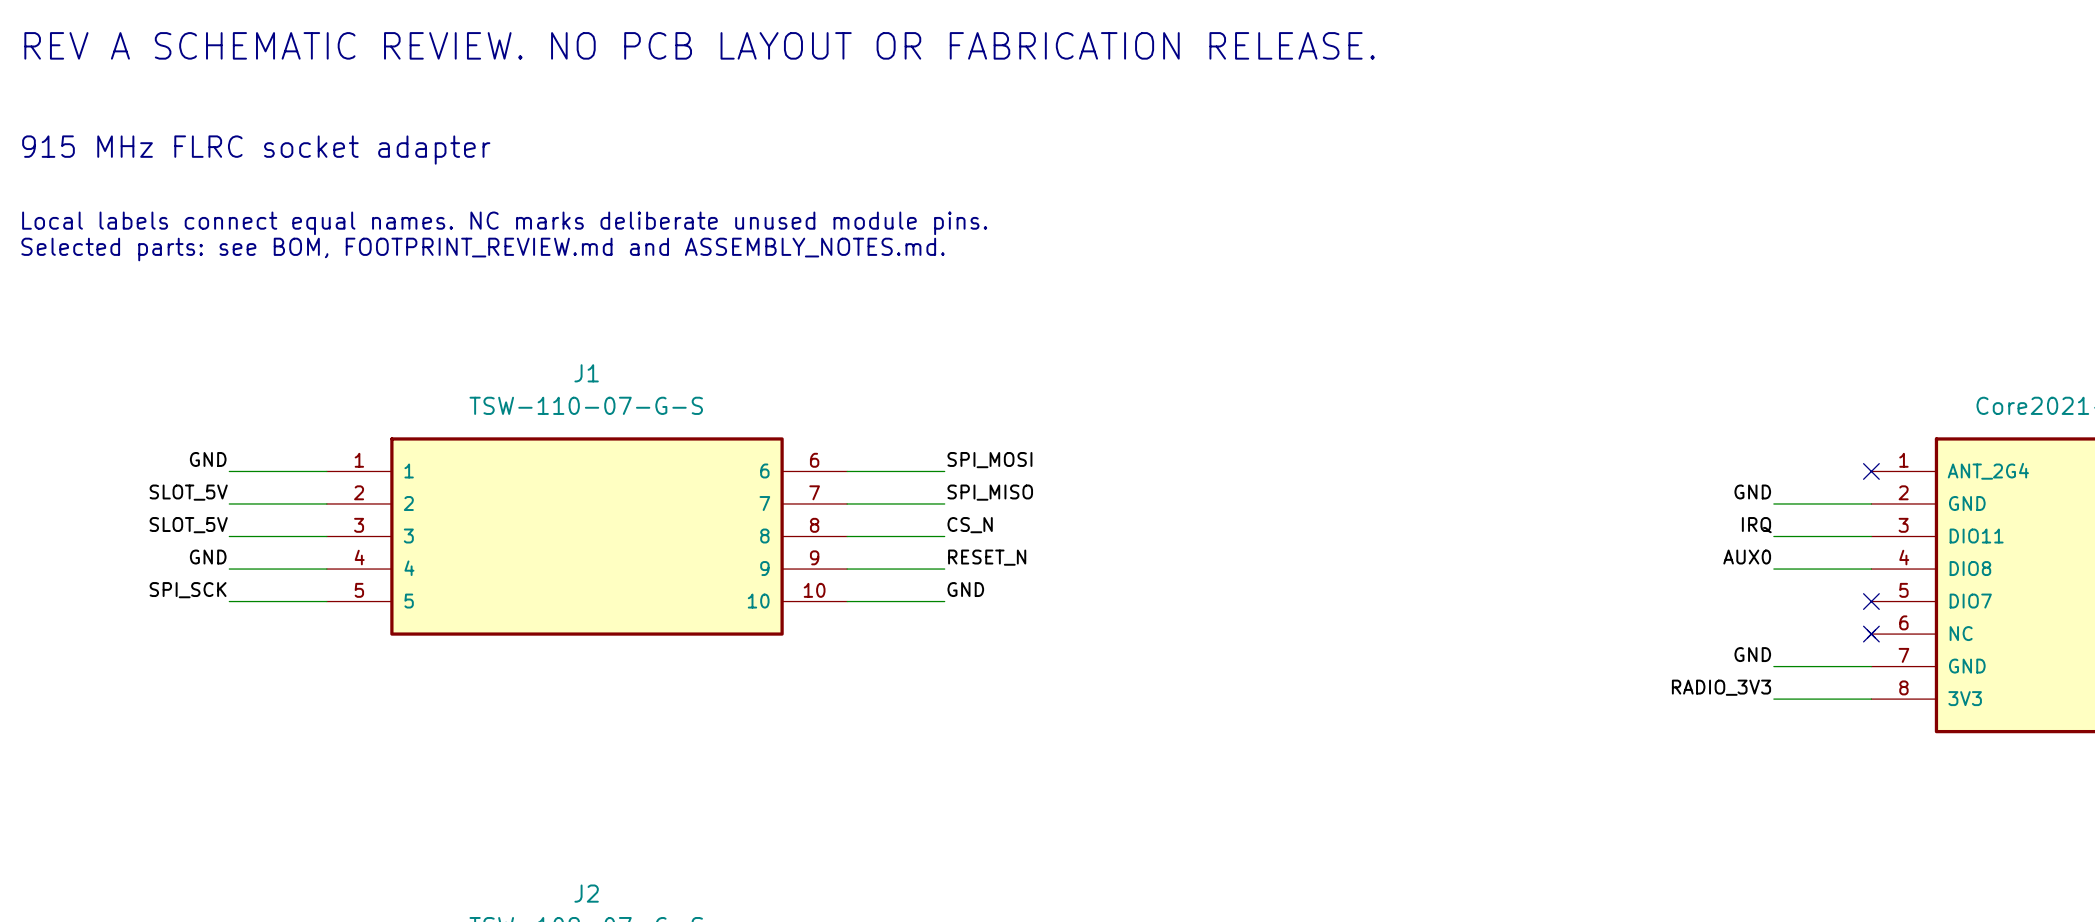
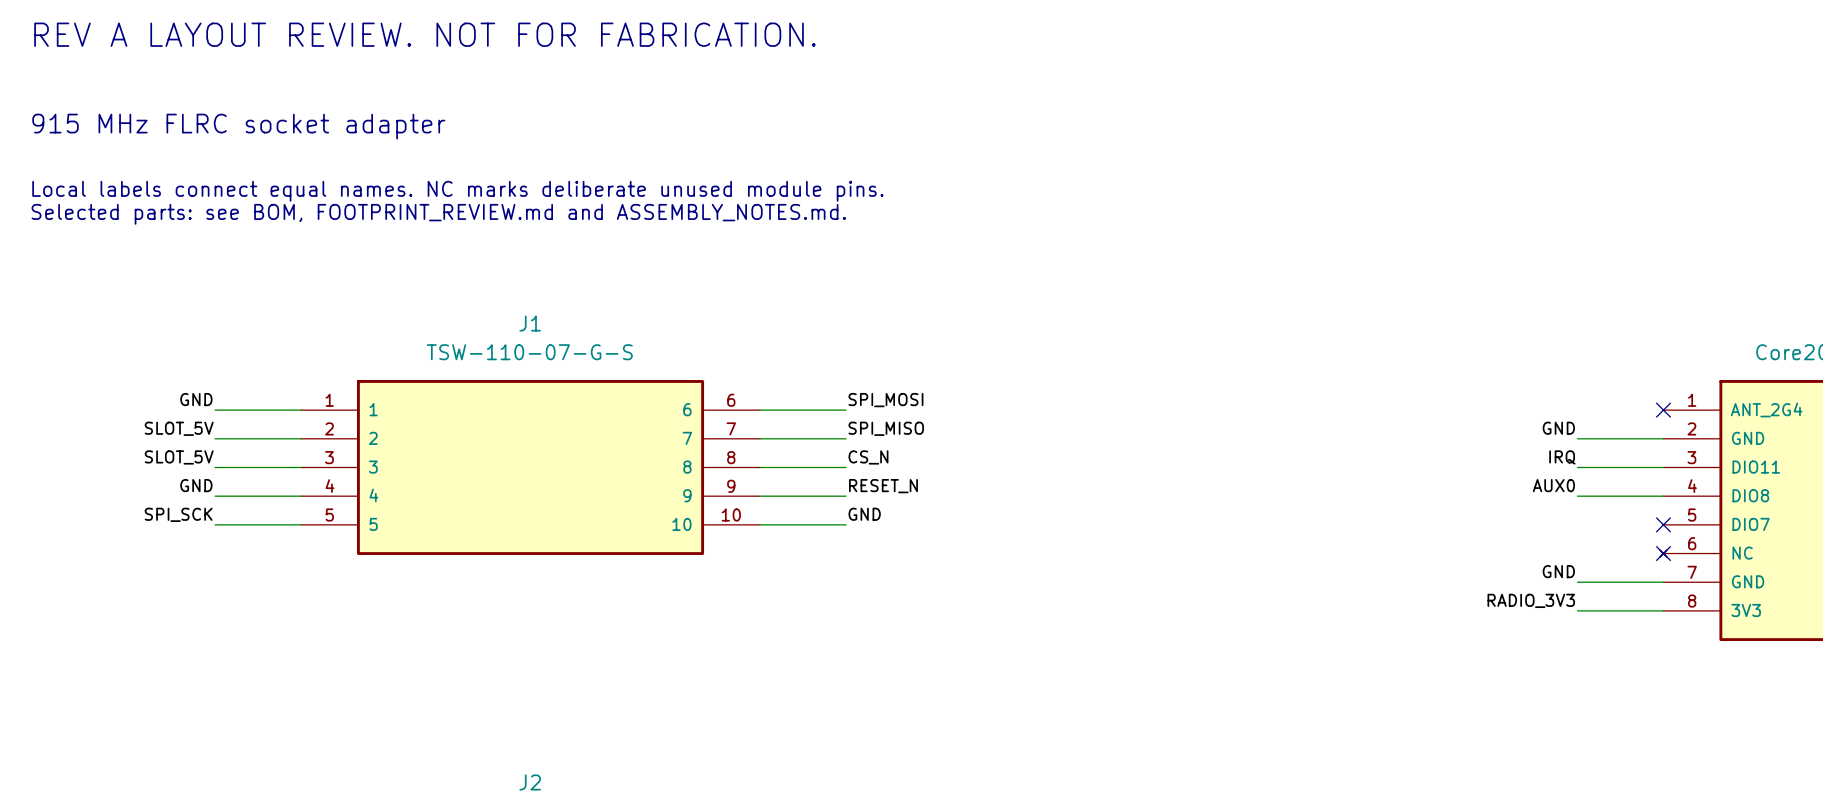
text: REV A SCHEMATIC REVIEW. NO PCB LAYOUT OR FABRICATION RELEASE. (699, 45) -> REV A LAYOUT REVIEW. NOT FOR FABRICATION. (424, 34)

